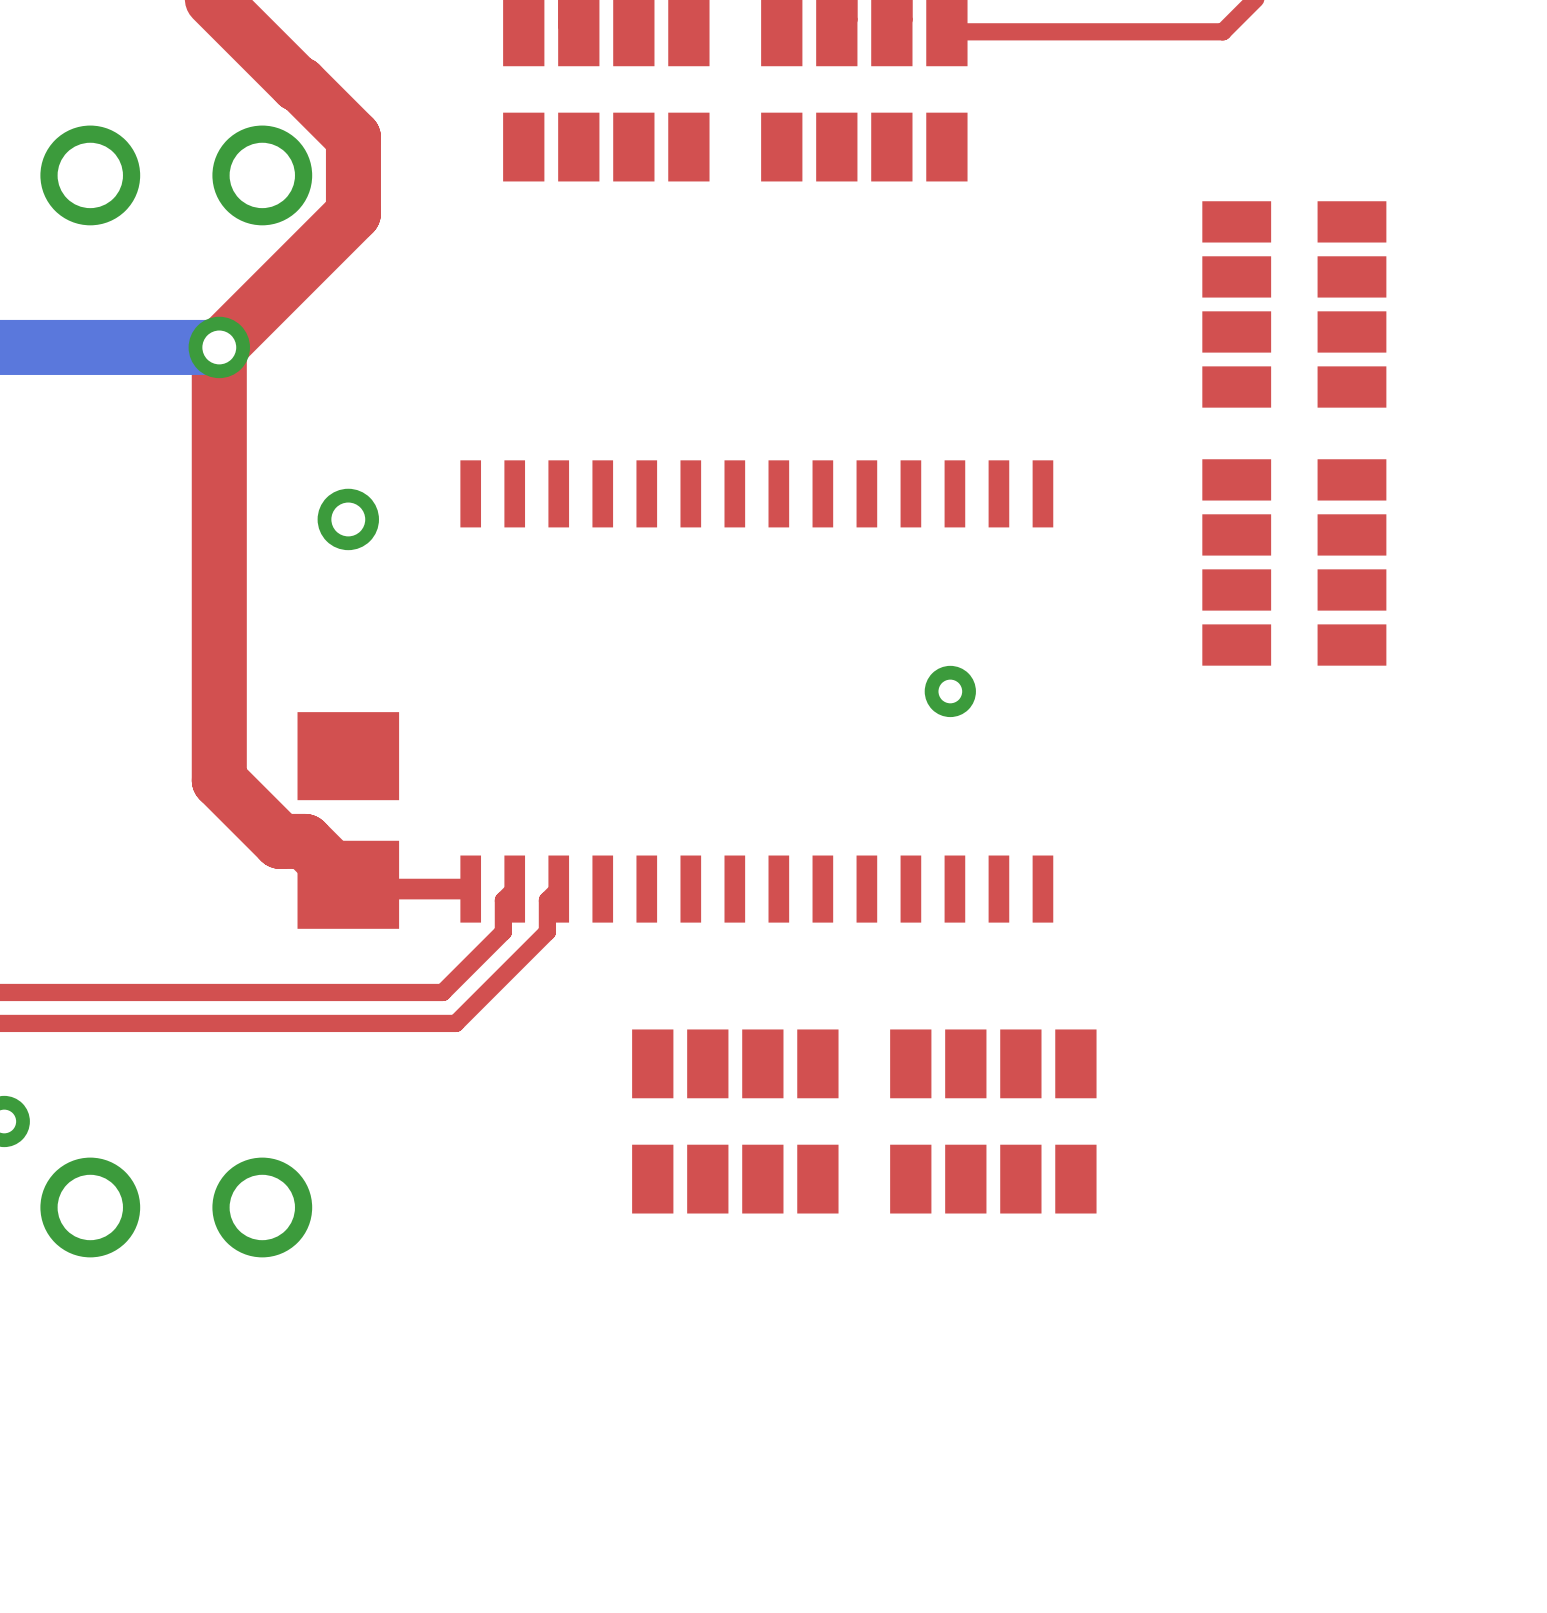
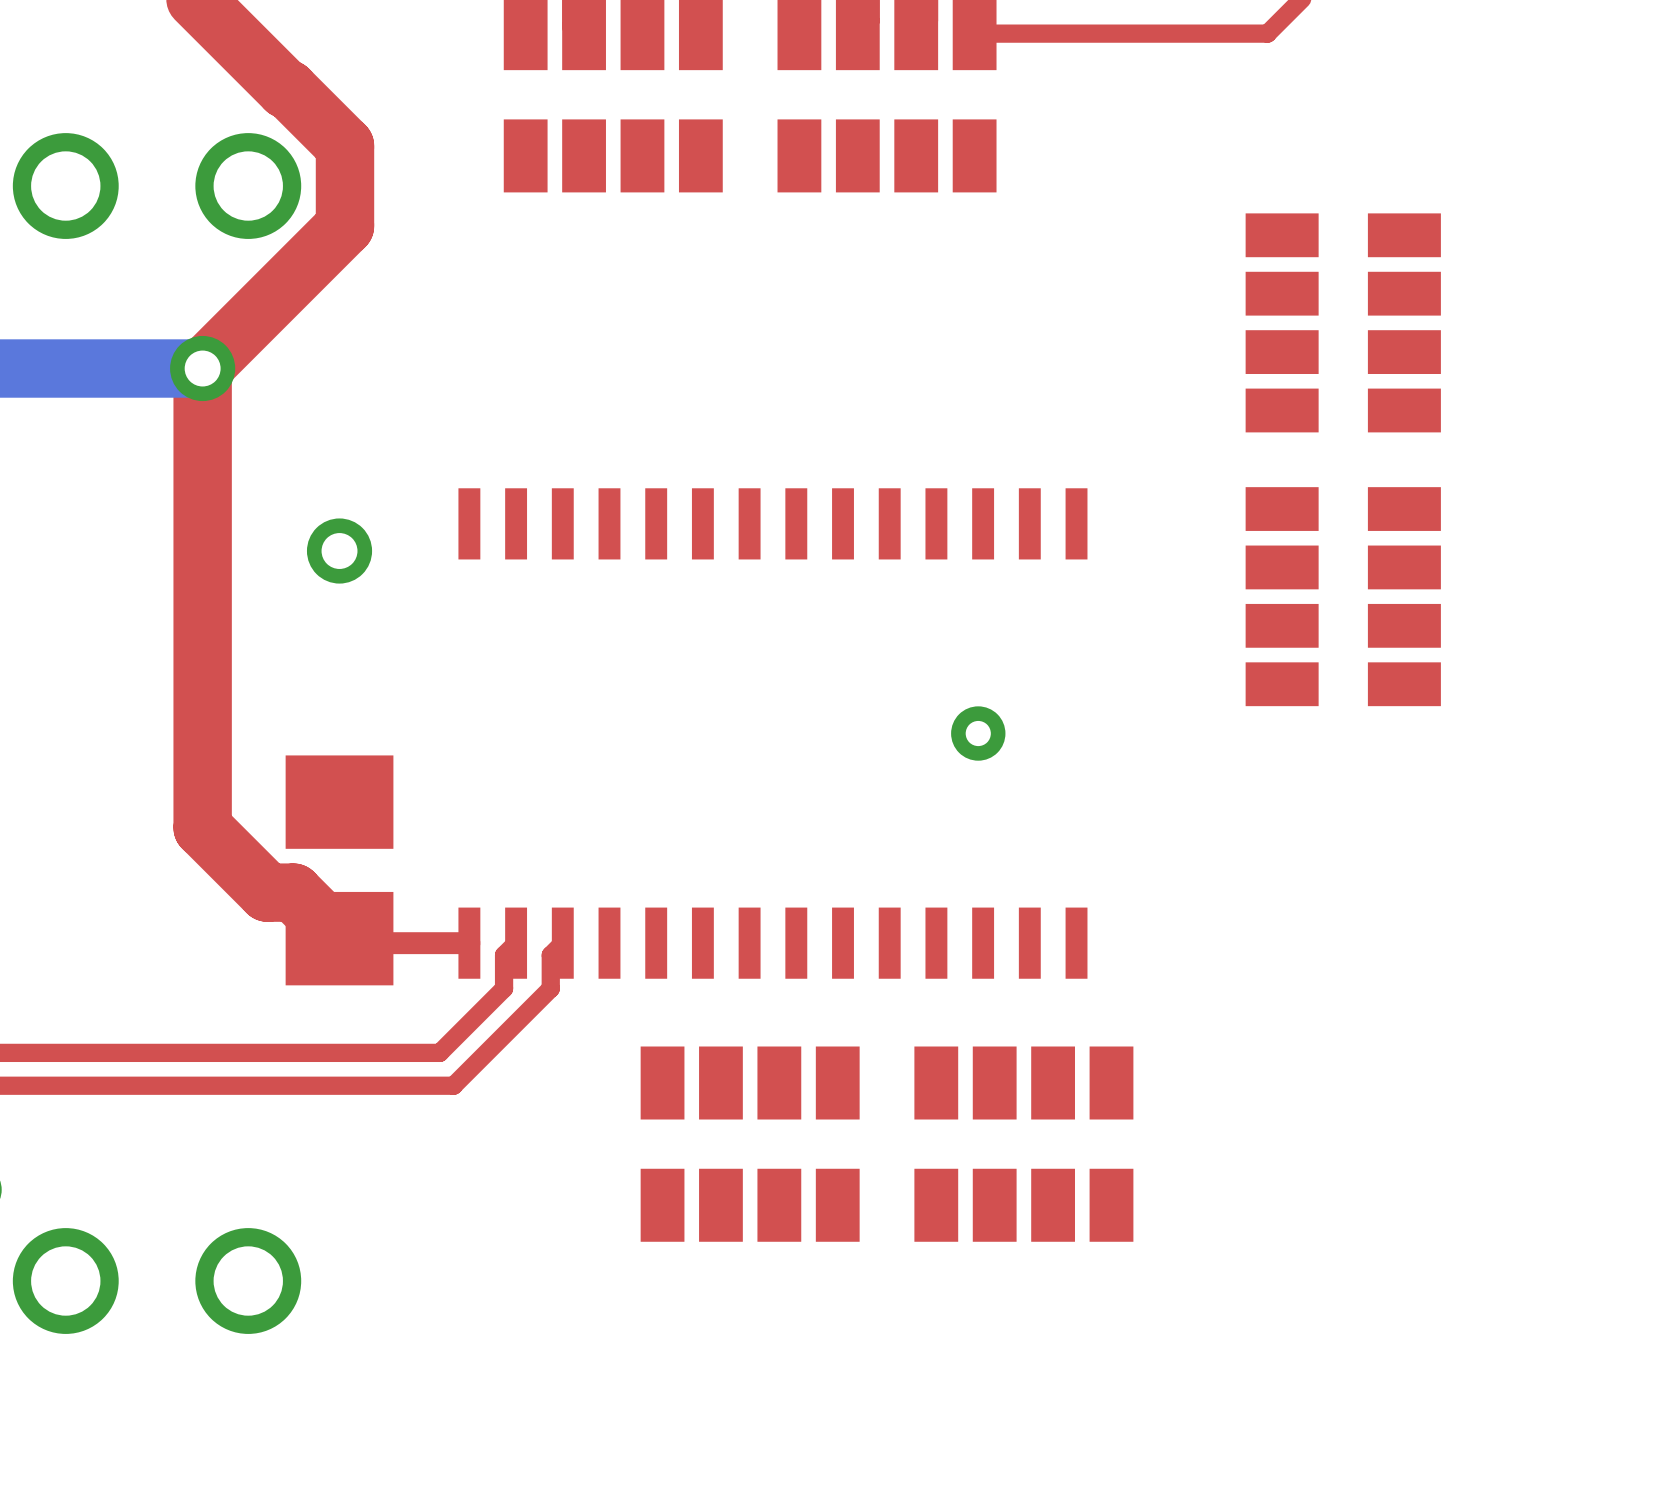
part position: (735, 1121) -> (750, 1144)
part position: (993, 1121) -> (1023, 1144)

